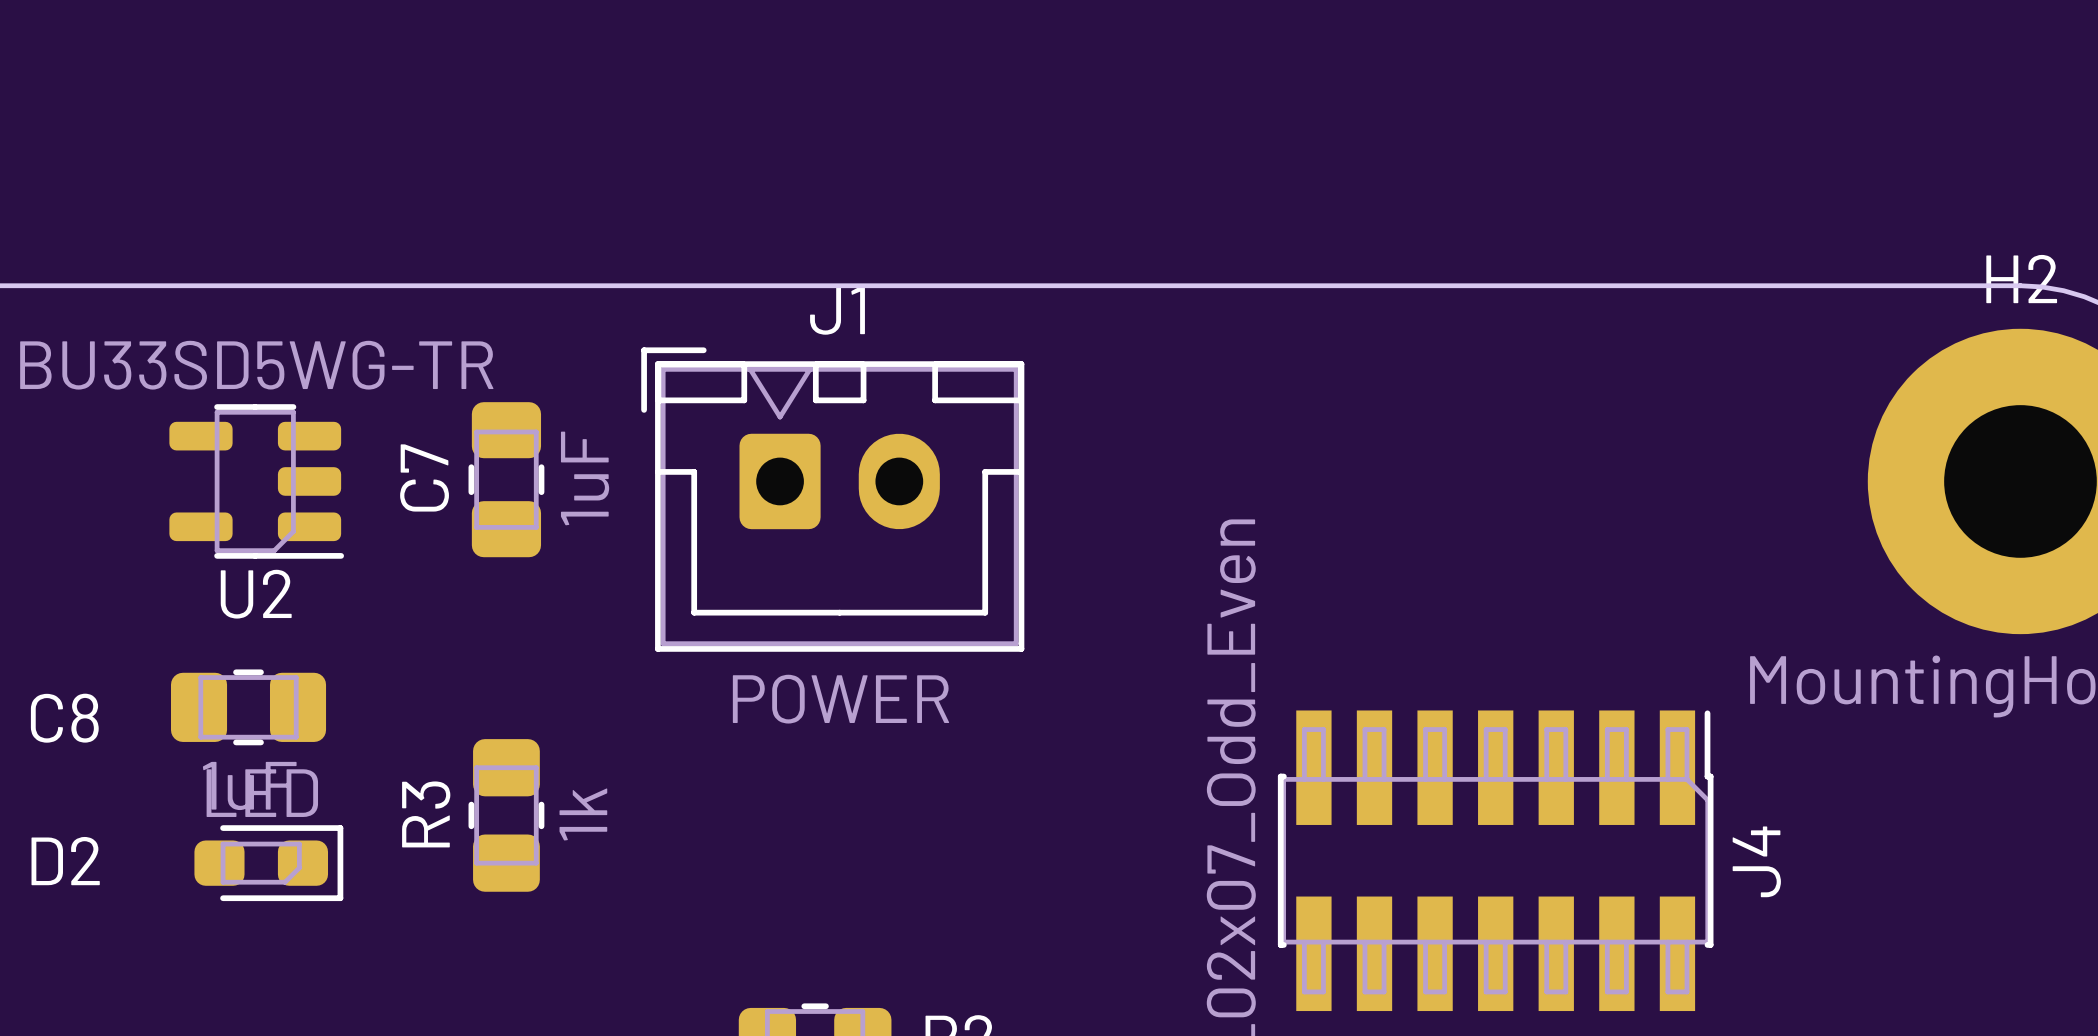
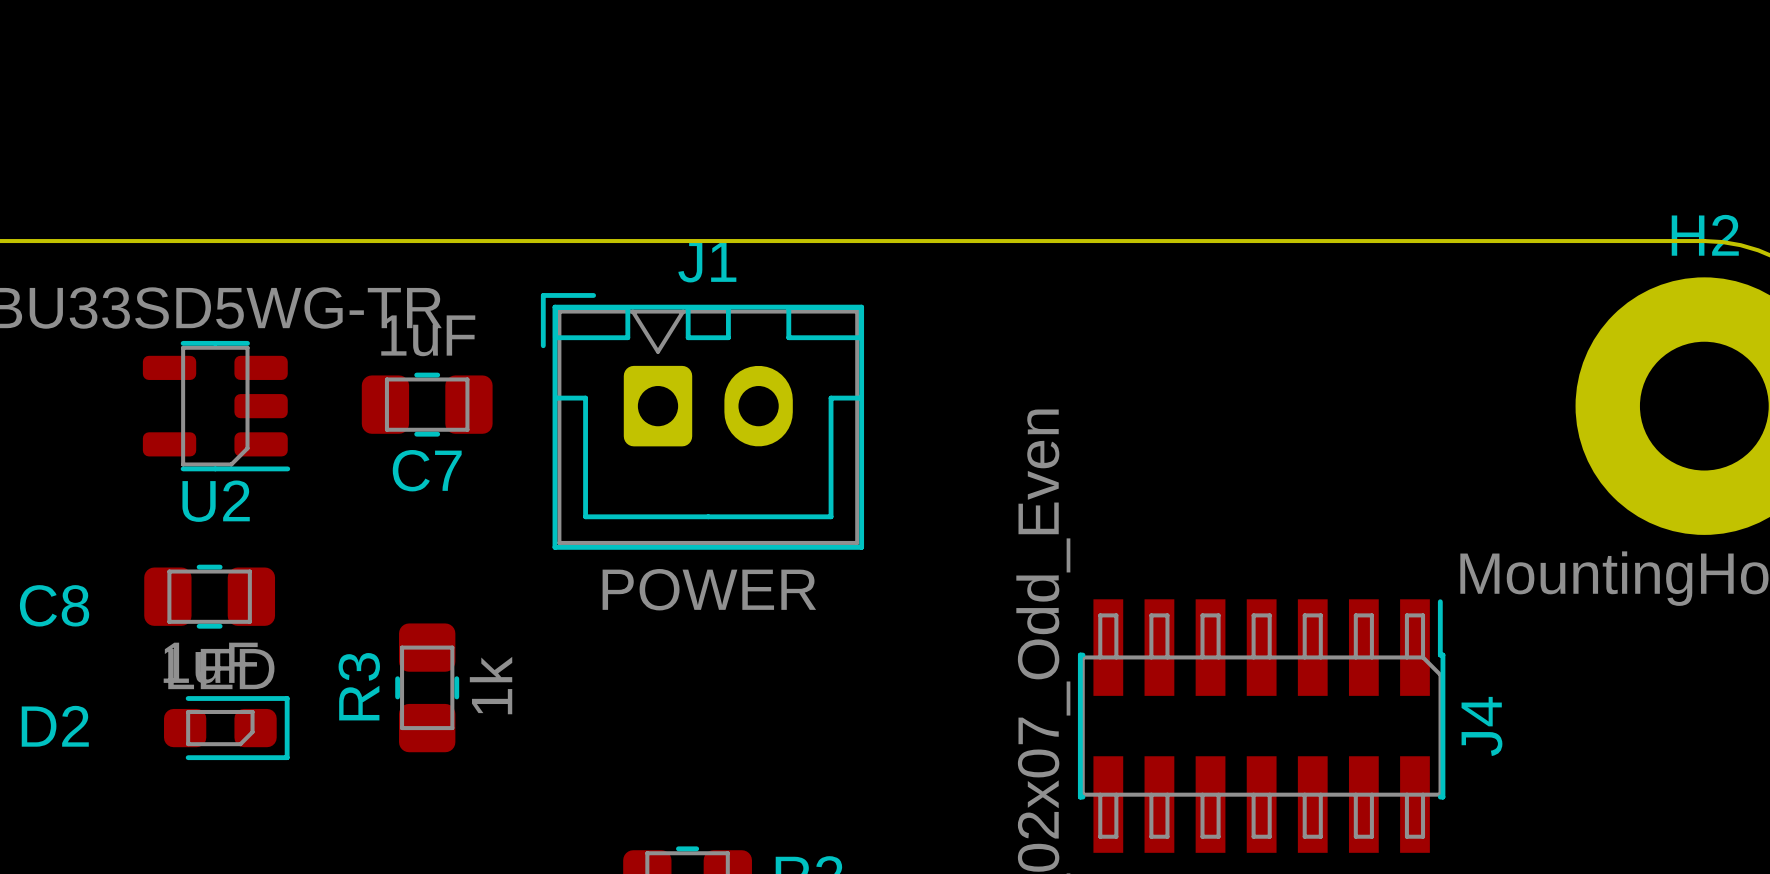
C7 name position: C7 (424, 477) -> C7 (427, 470)
C7 value position: 1uF (585, 478) -> 1uF (428, 335)
C7 rotation: 0° (506, 479) -> 90° clockwise (427, 404)

